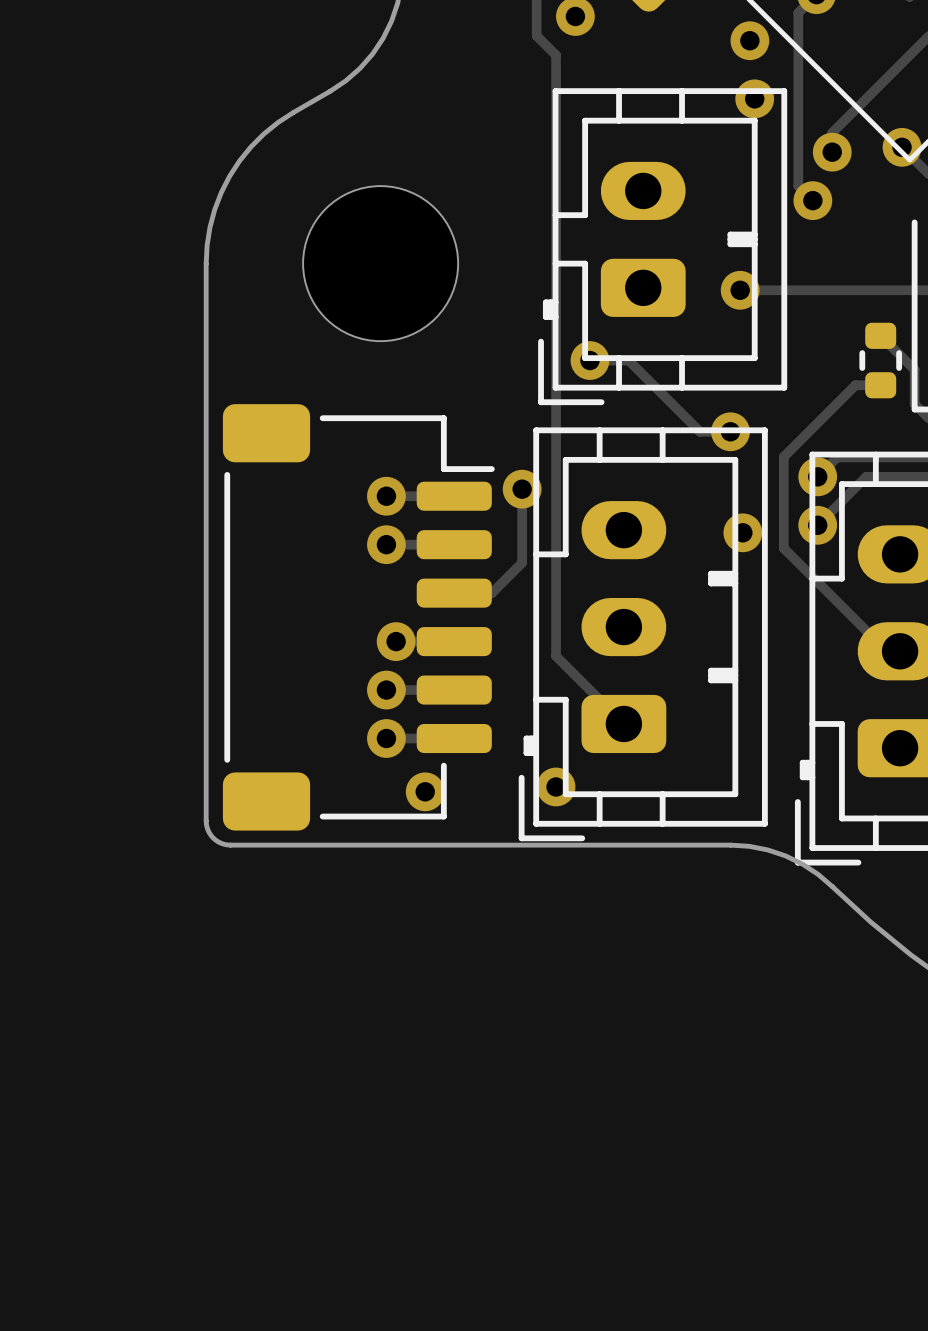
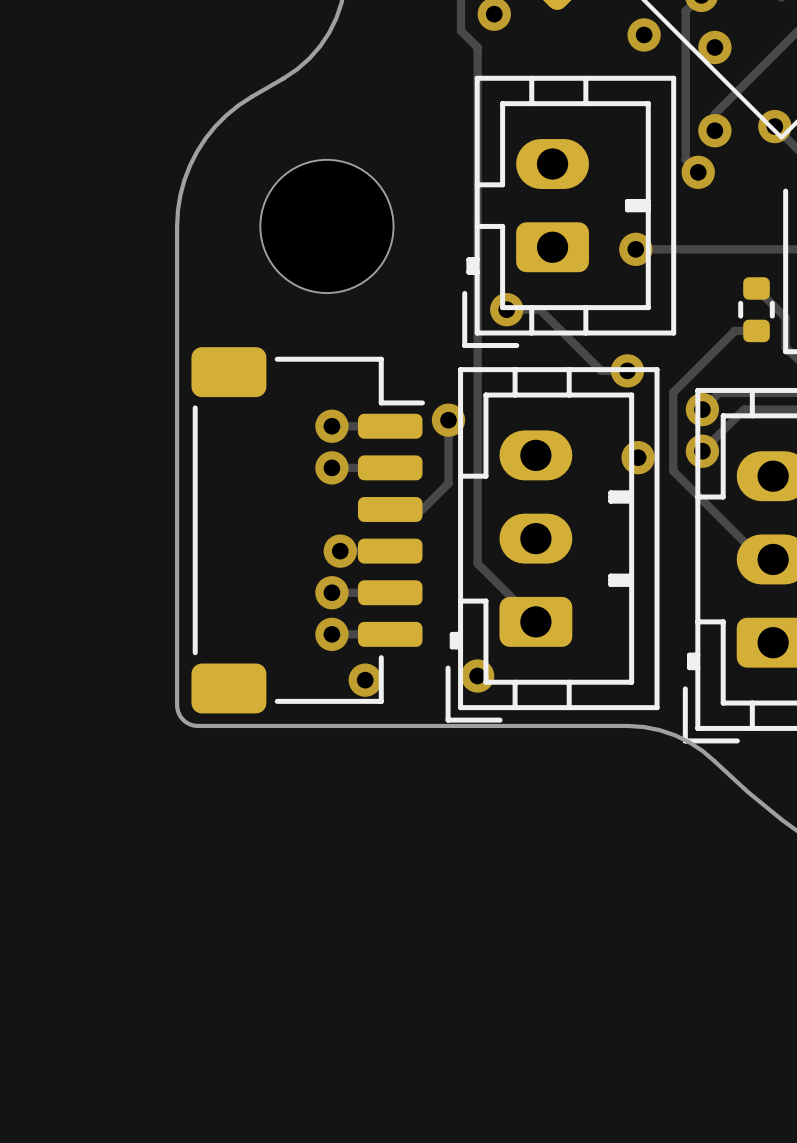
via position: (754, 98) -> (714, 47)

